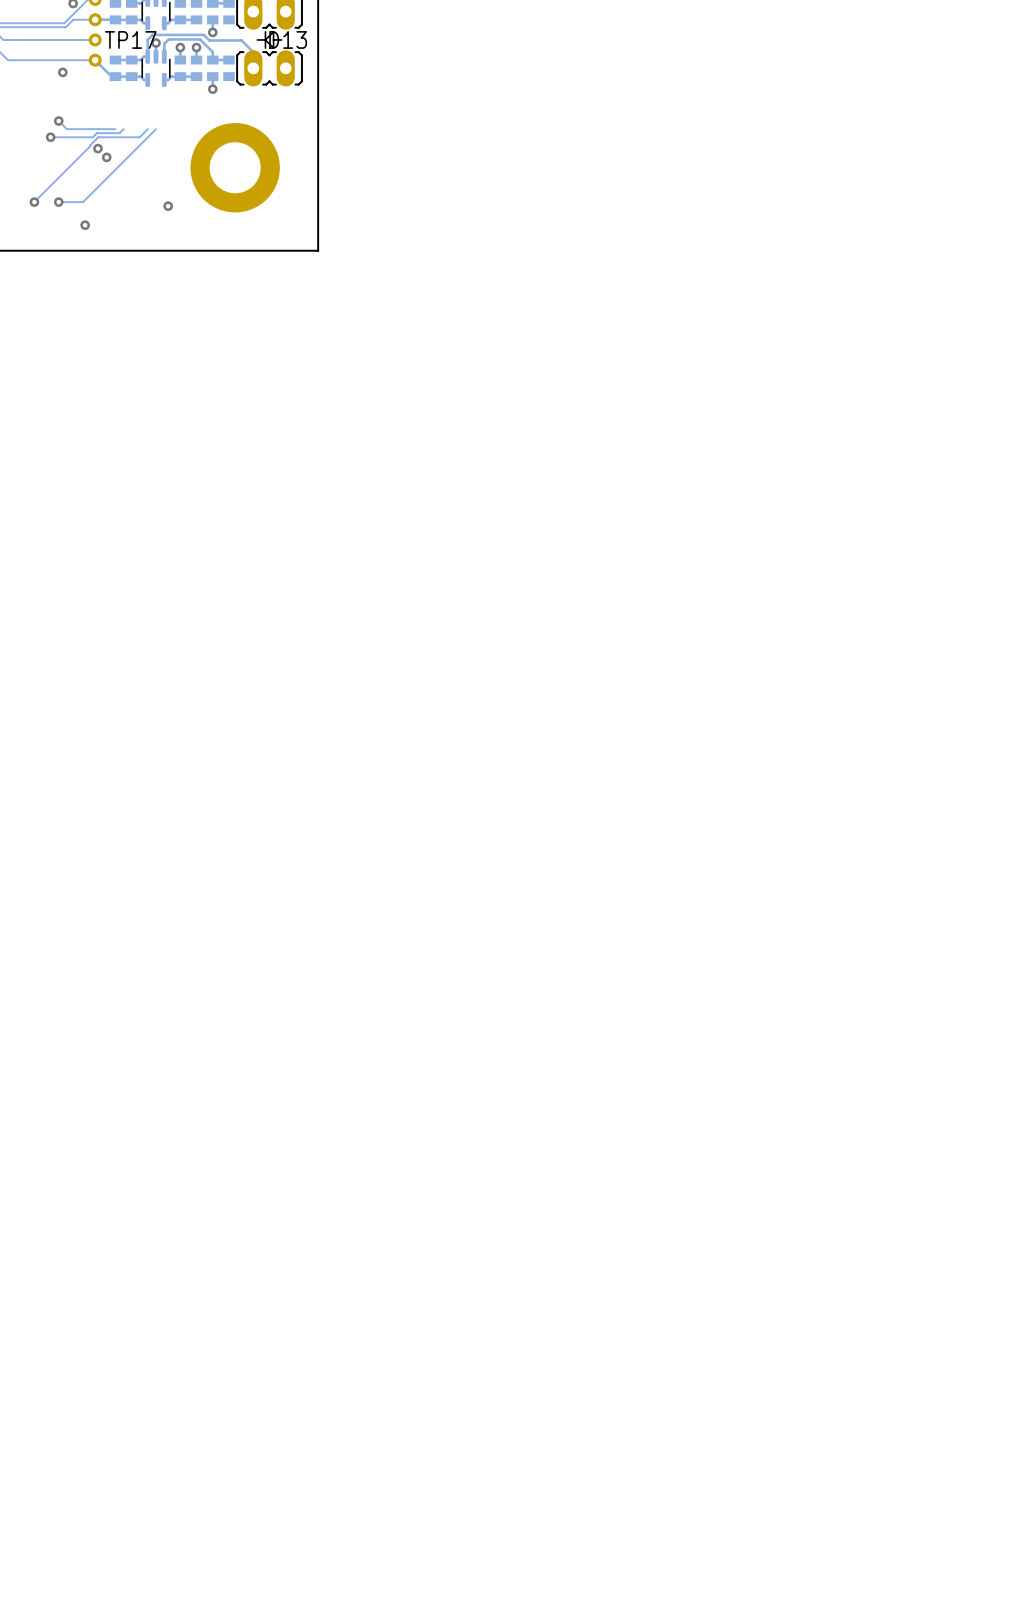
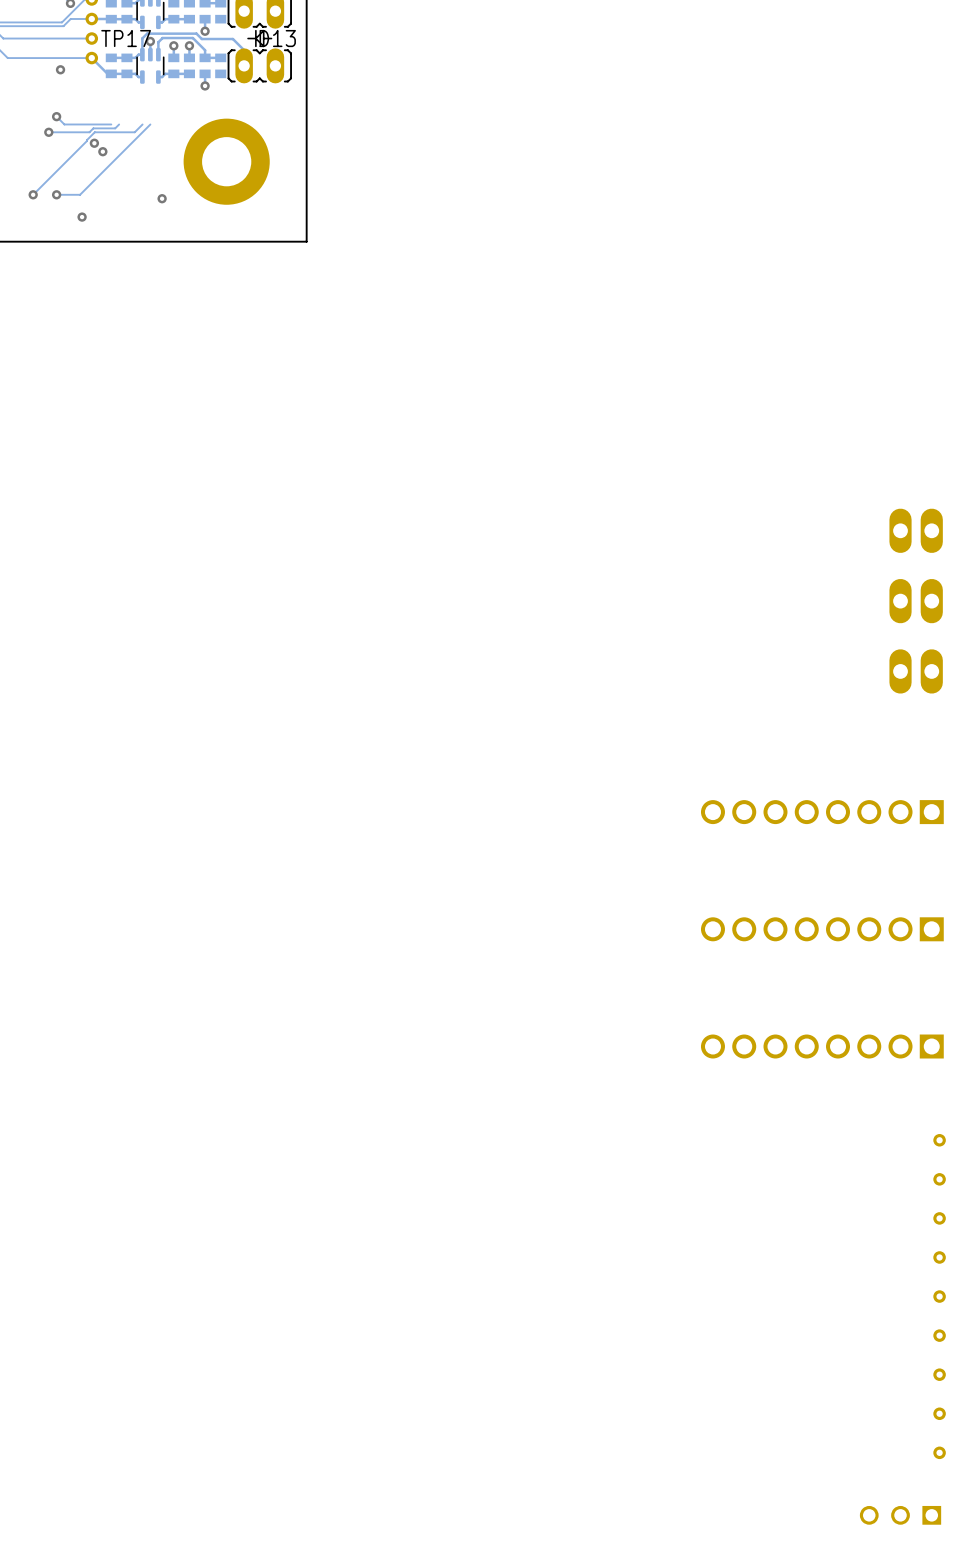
part: none -> (916, 530)
part: none -> (916, 601)
part: none -> (916, 671)
part: none -> (822, 812)
part: none -> (822, 929)
part: none -> (822, 1046)
part: none -> (939, 1140)
part: none -> (939, 1179)
part: none -> (939, 1218)
part: none -> (939, 1257)
part: none -> (939, 1296)
part: none -> (939, 1335)
part: none -> (939, 1374)
part: none -> (939, 1413)
part: none -> (939, 1452)
part: none -> (900, 1515)

